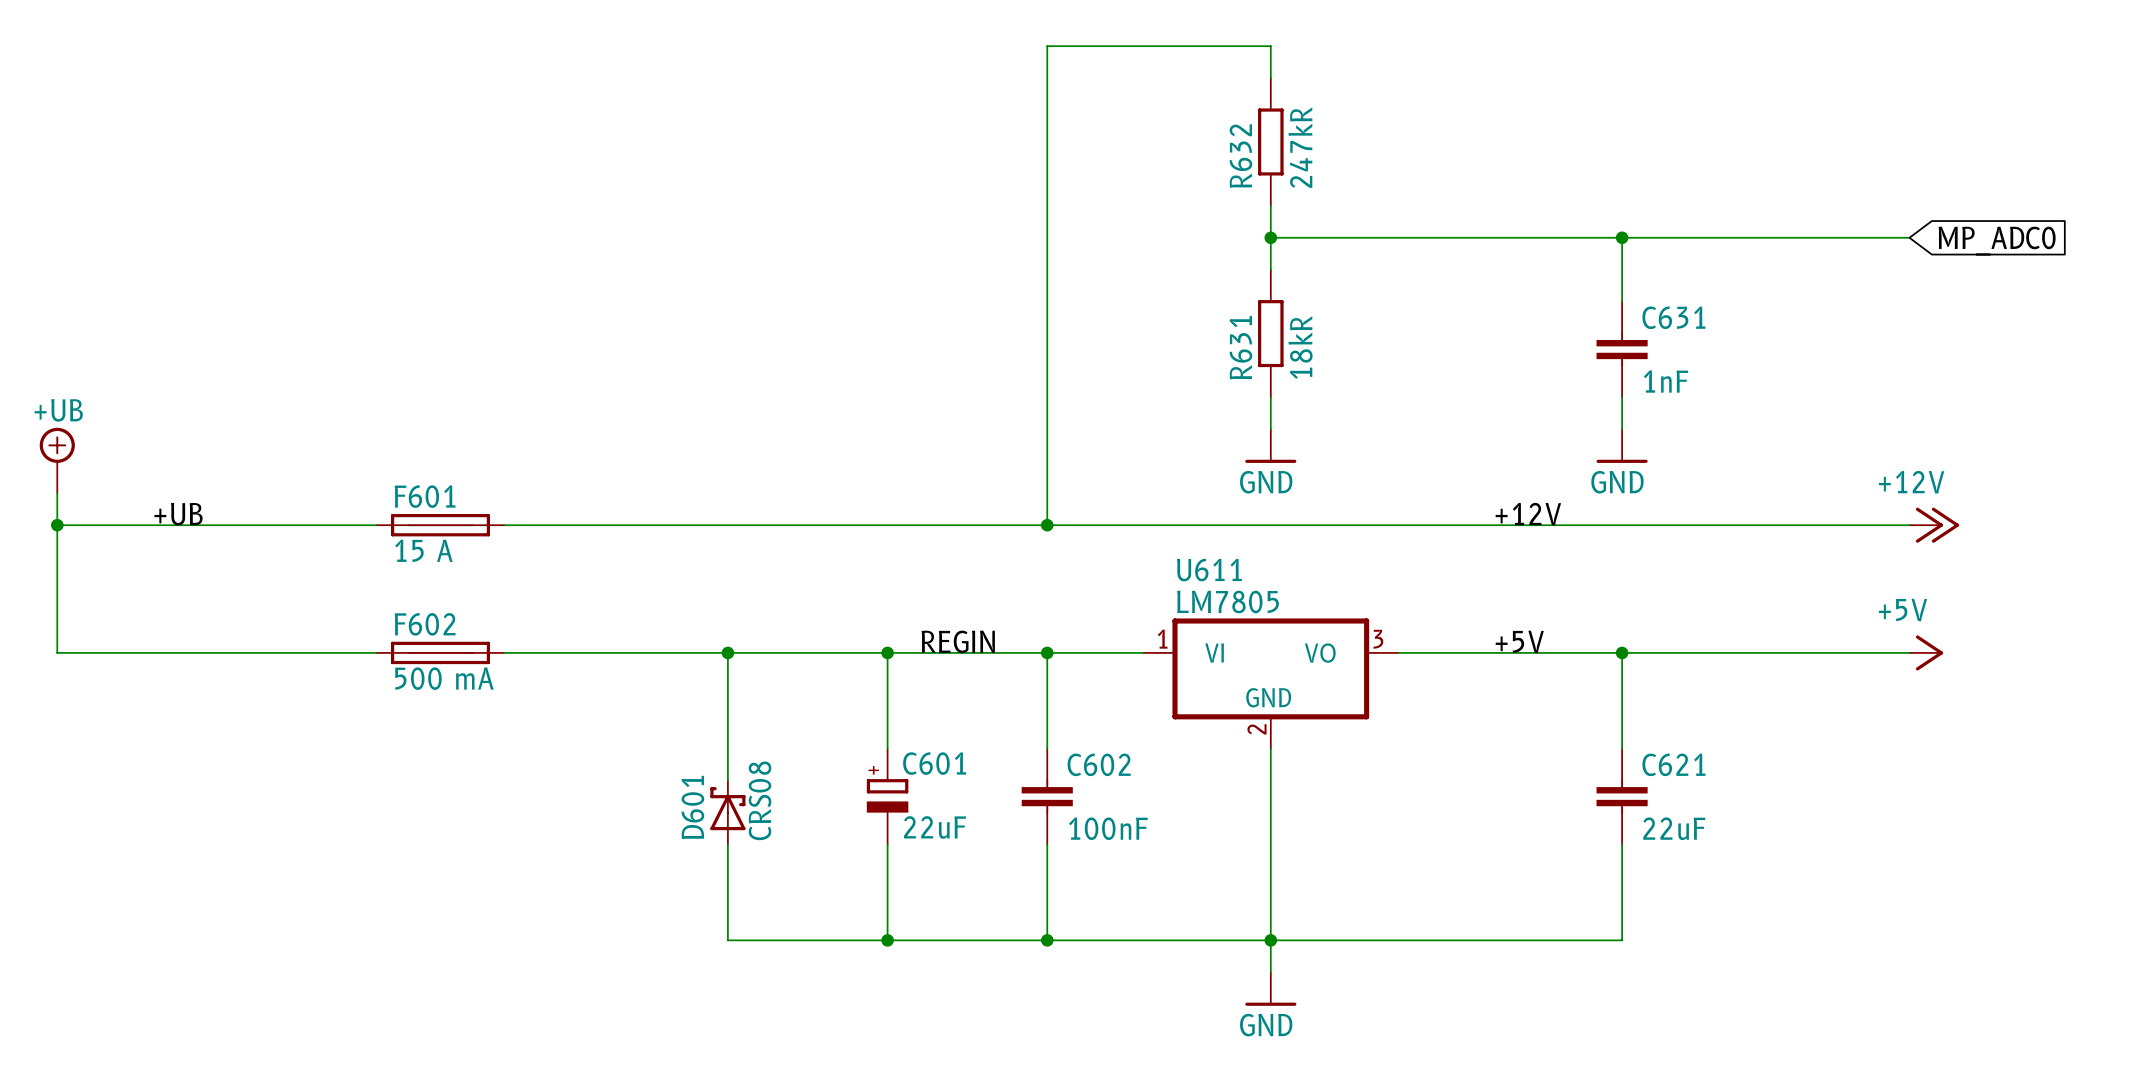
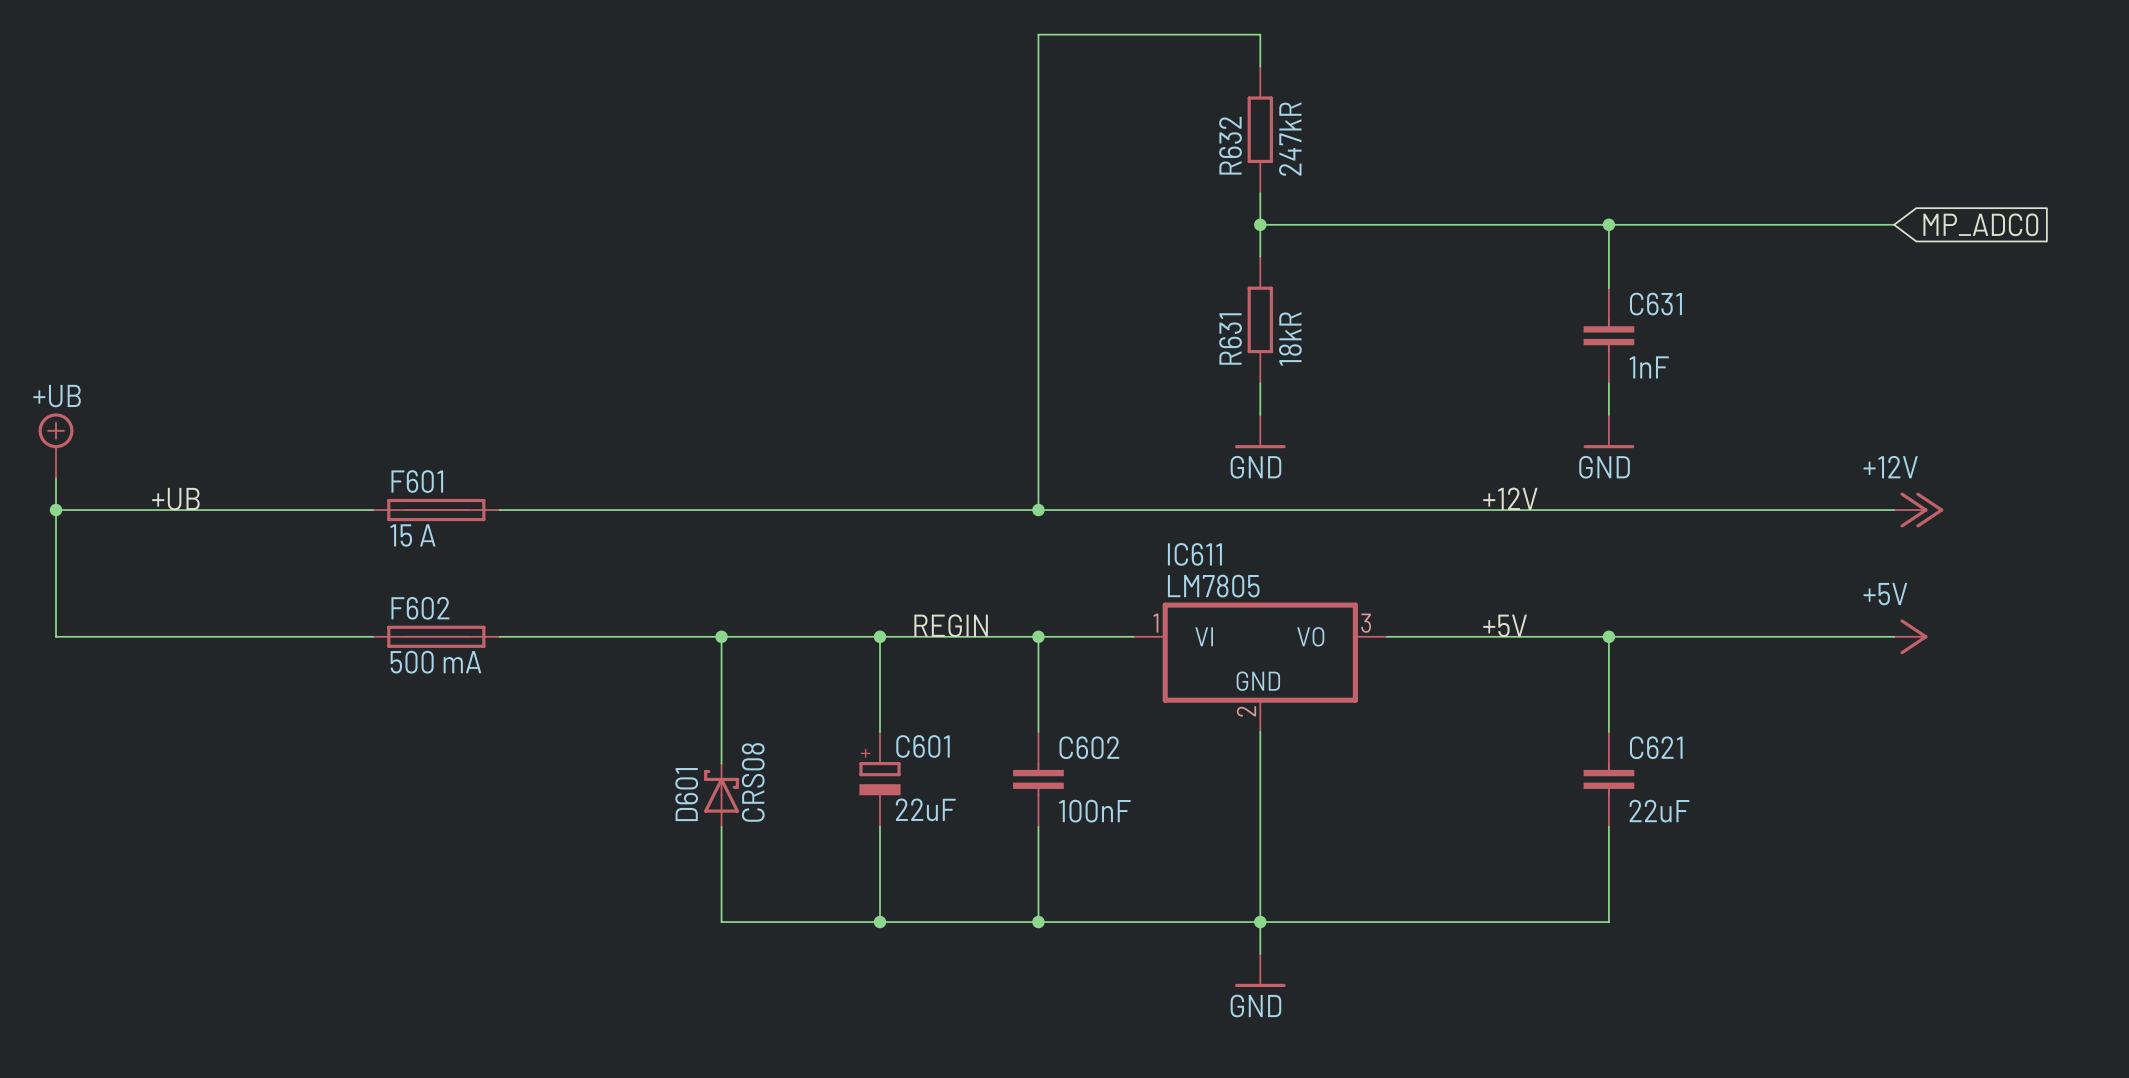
U611 name: U611 (1209, 570) -> IC611 (1194, 554)

